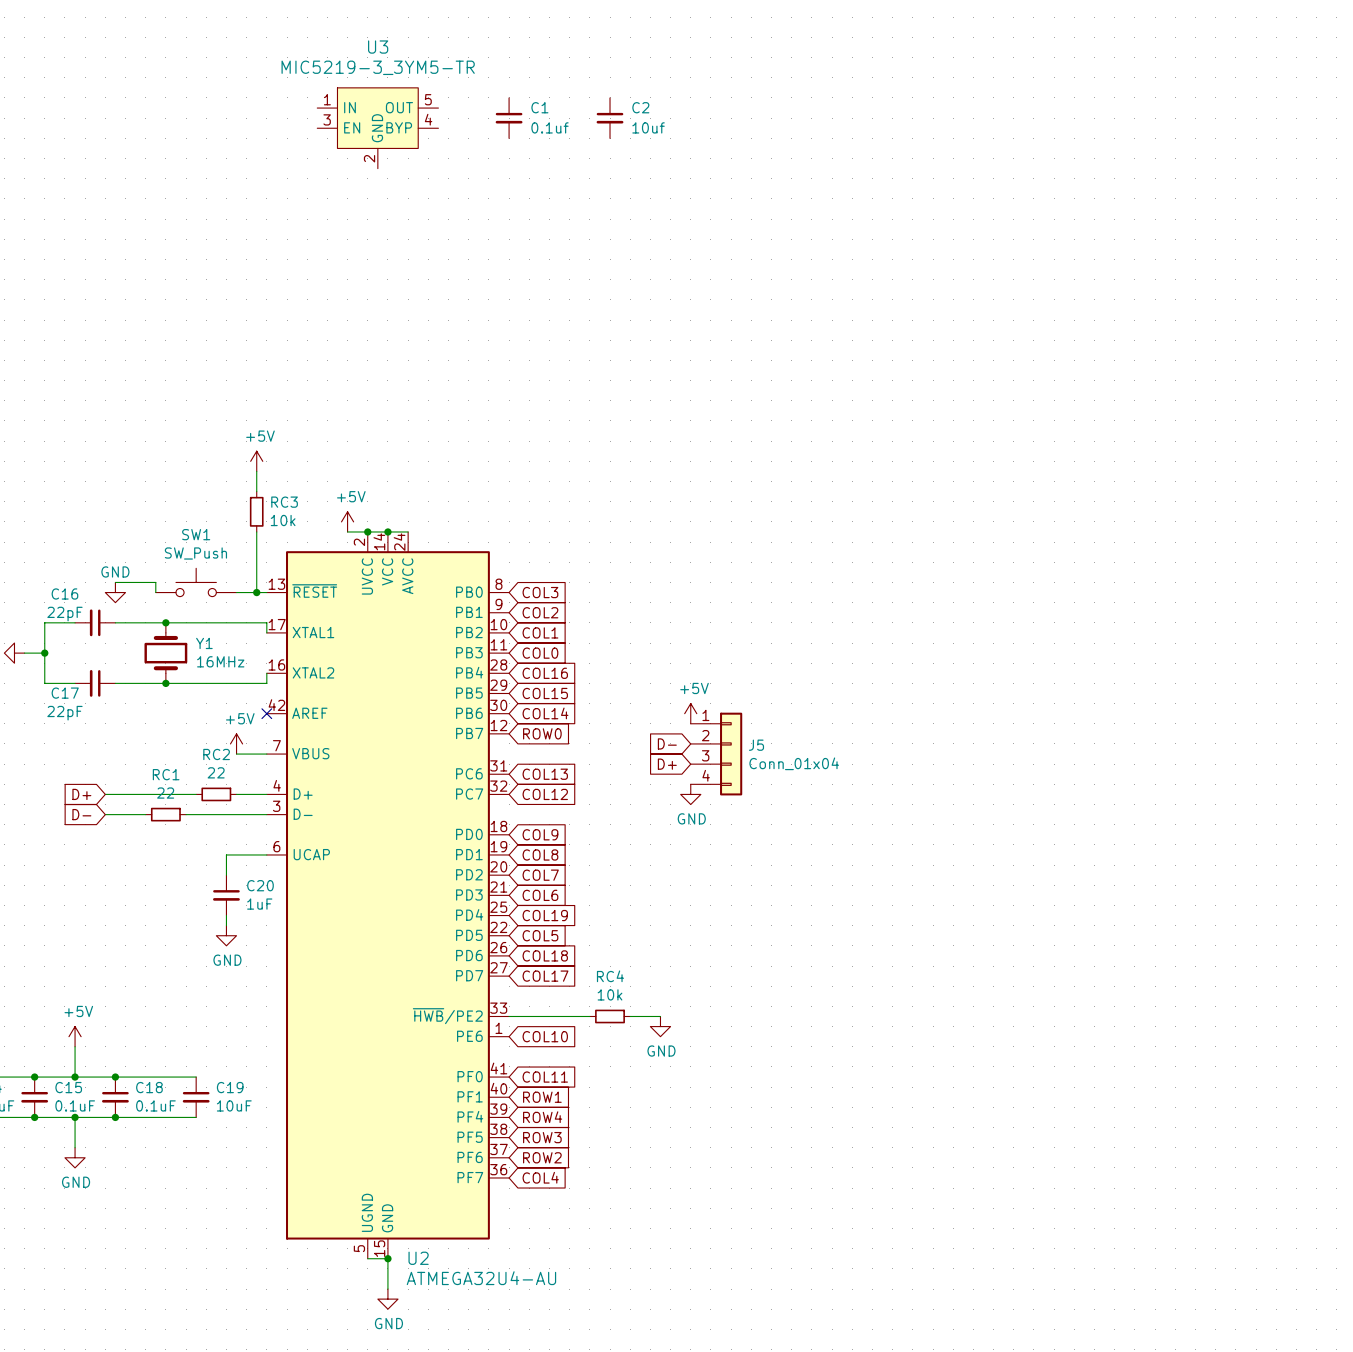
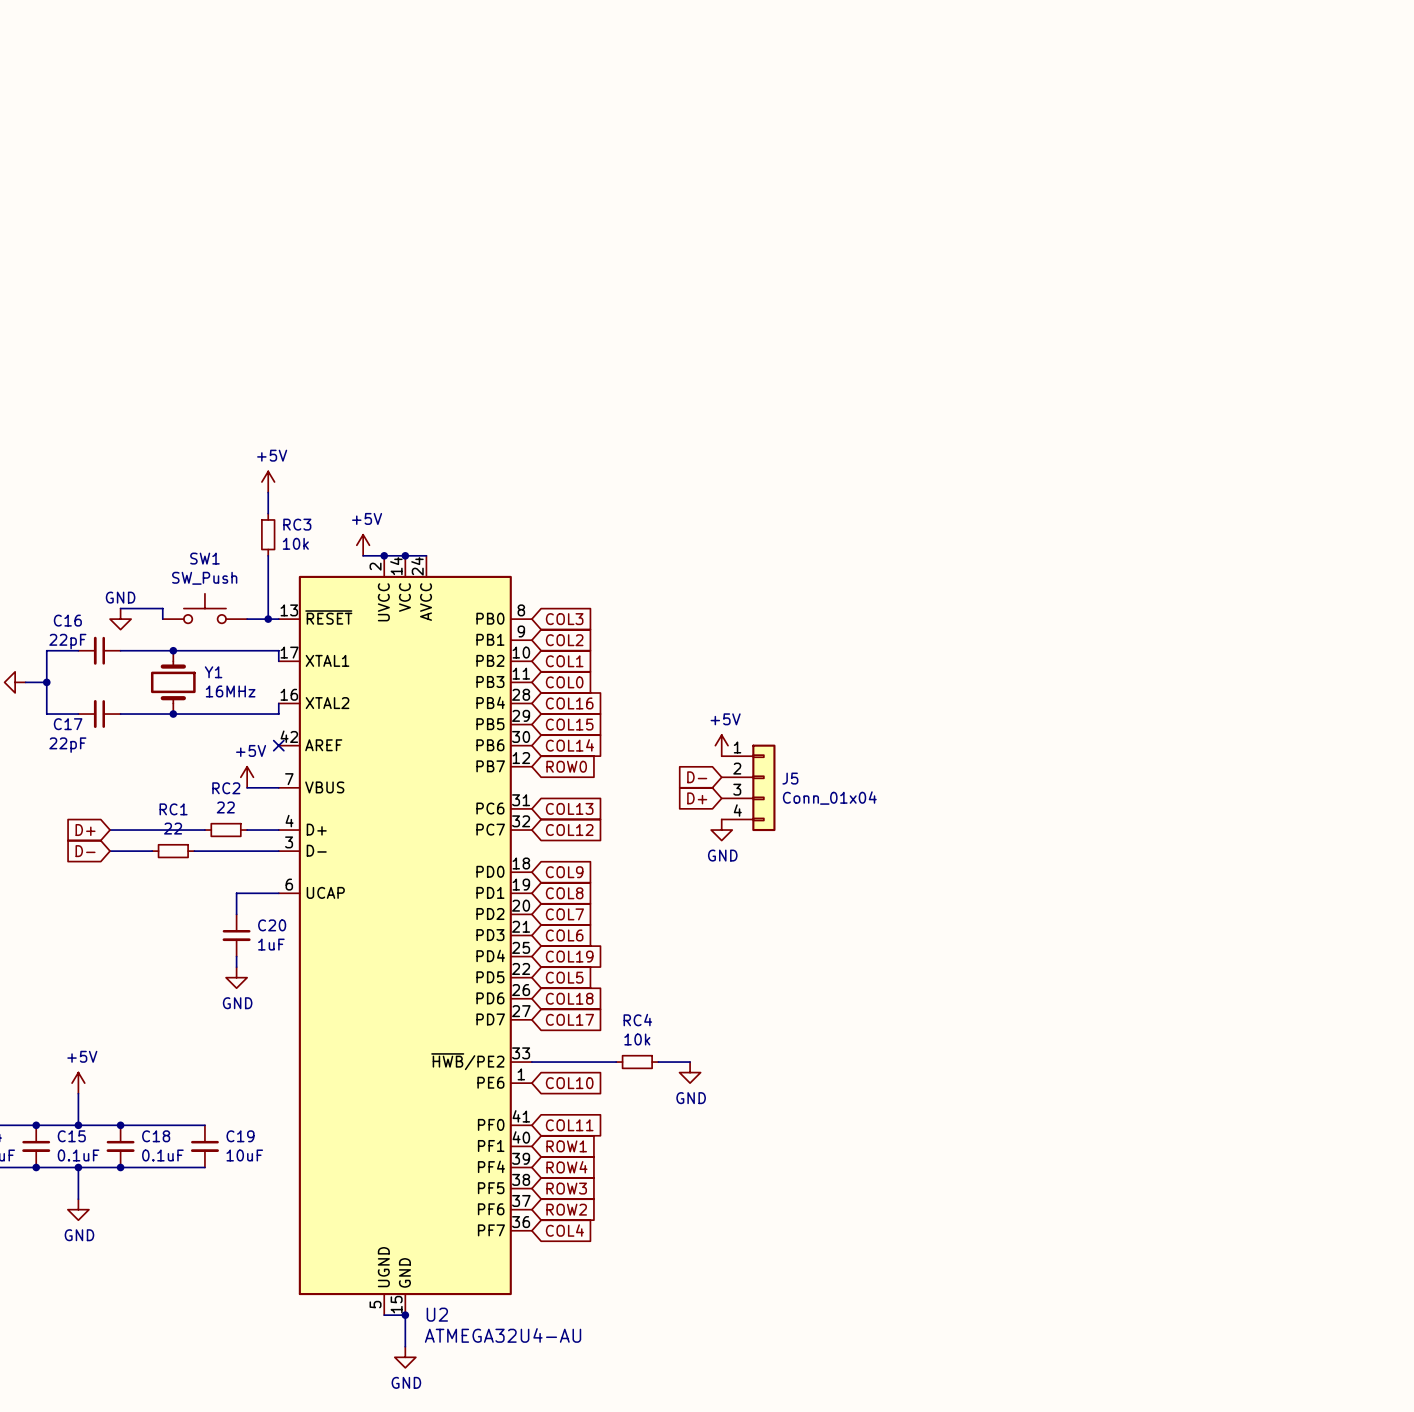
C1: 0.1uf (509, 118) -> none
C2: 10uf (610, 118) -> none
U3: MIC5219-3_3YM5-TR (377, 128) -> none

